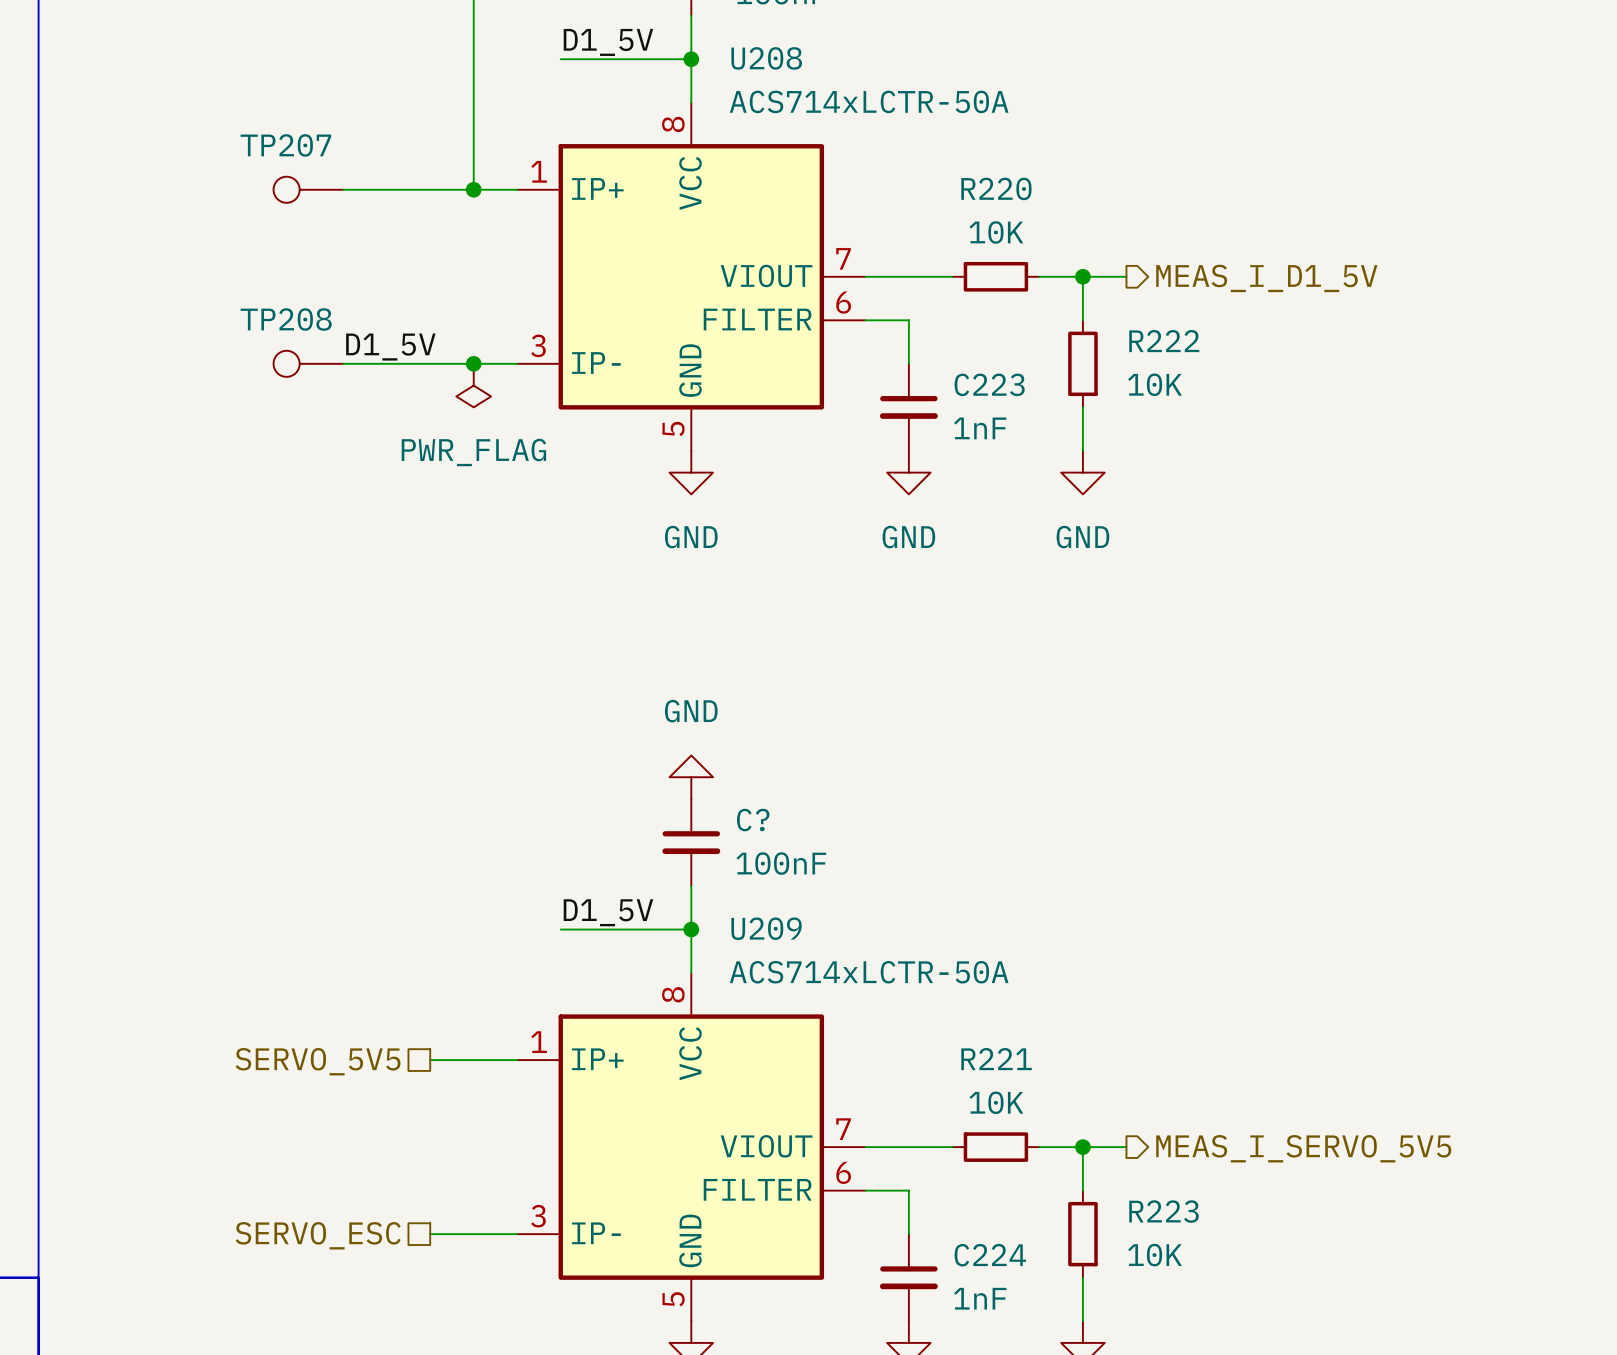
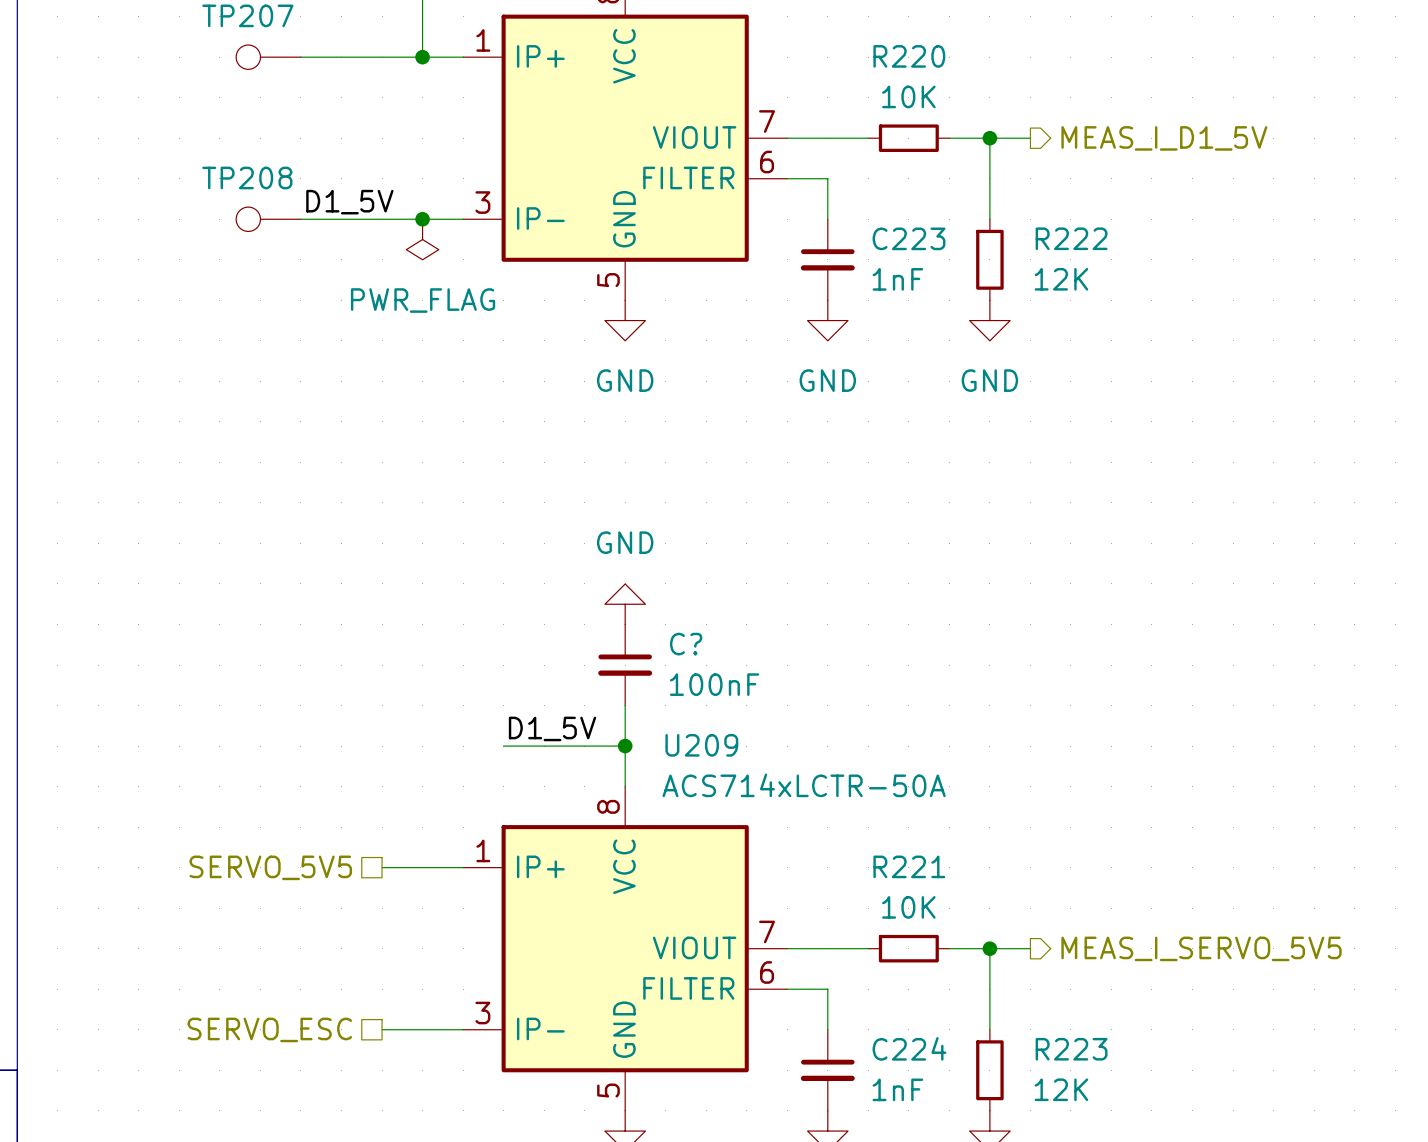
R222 position: (1082, 363) -> (989, 259)
R222 value: 10K (1155, 384) -> 12K (1061, 279)
wire: (1082, 407) (1082, 450) -> (989, 178) (989, 219)
R223 position: (1082, 1234) -> (989, 1070)
R223 value: 10K (1155, 1255) -> 12K (1061, 1089)
wire: (1082, 1277) (1082, 1321) -> (989, 989) (989, 1029)

